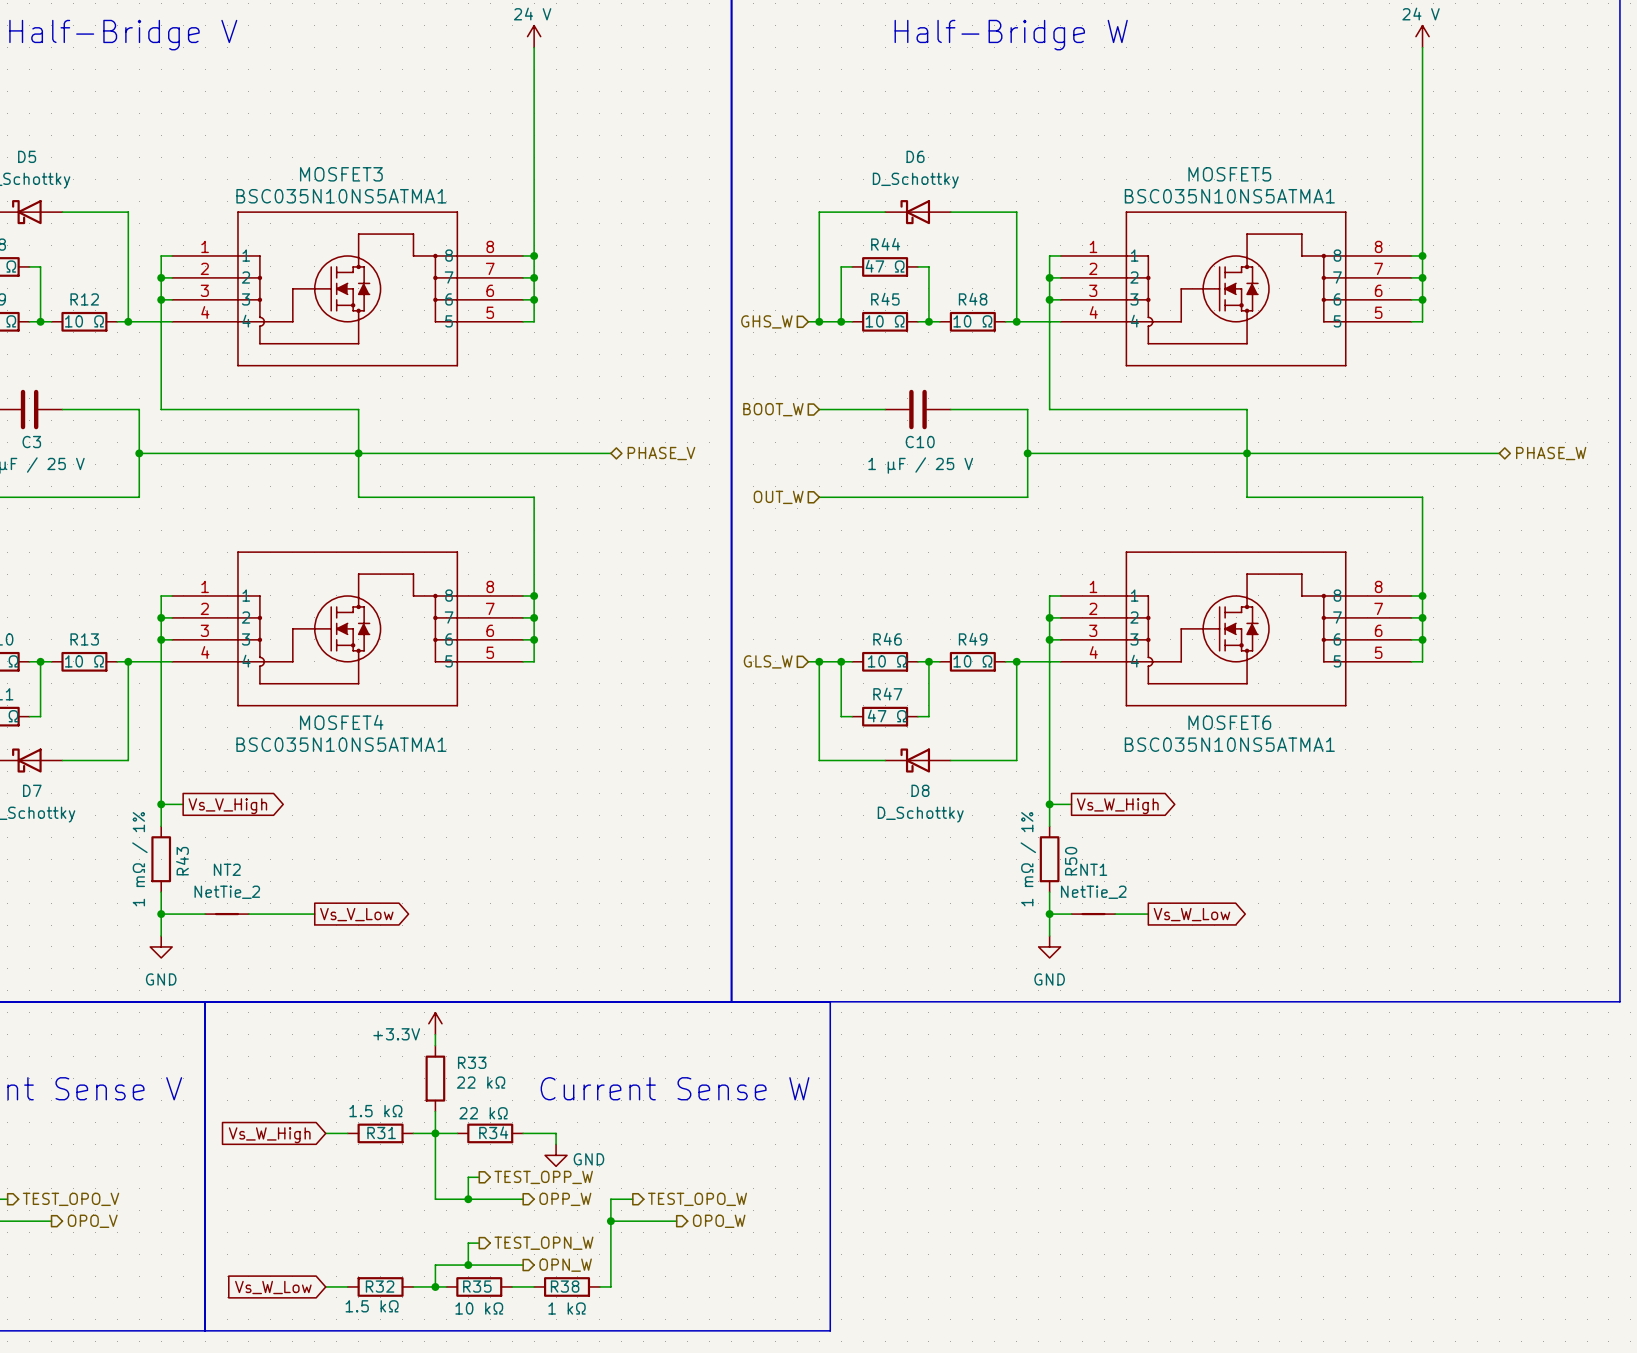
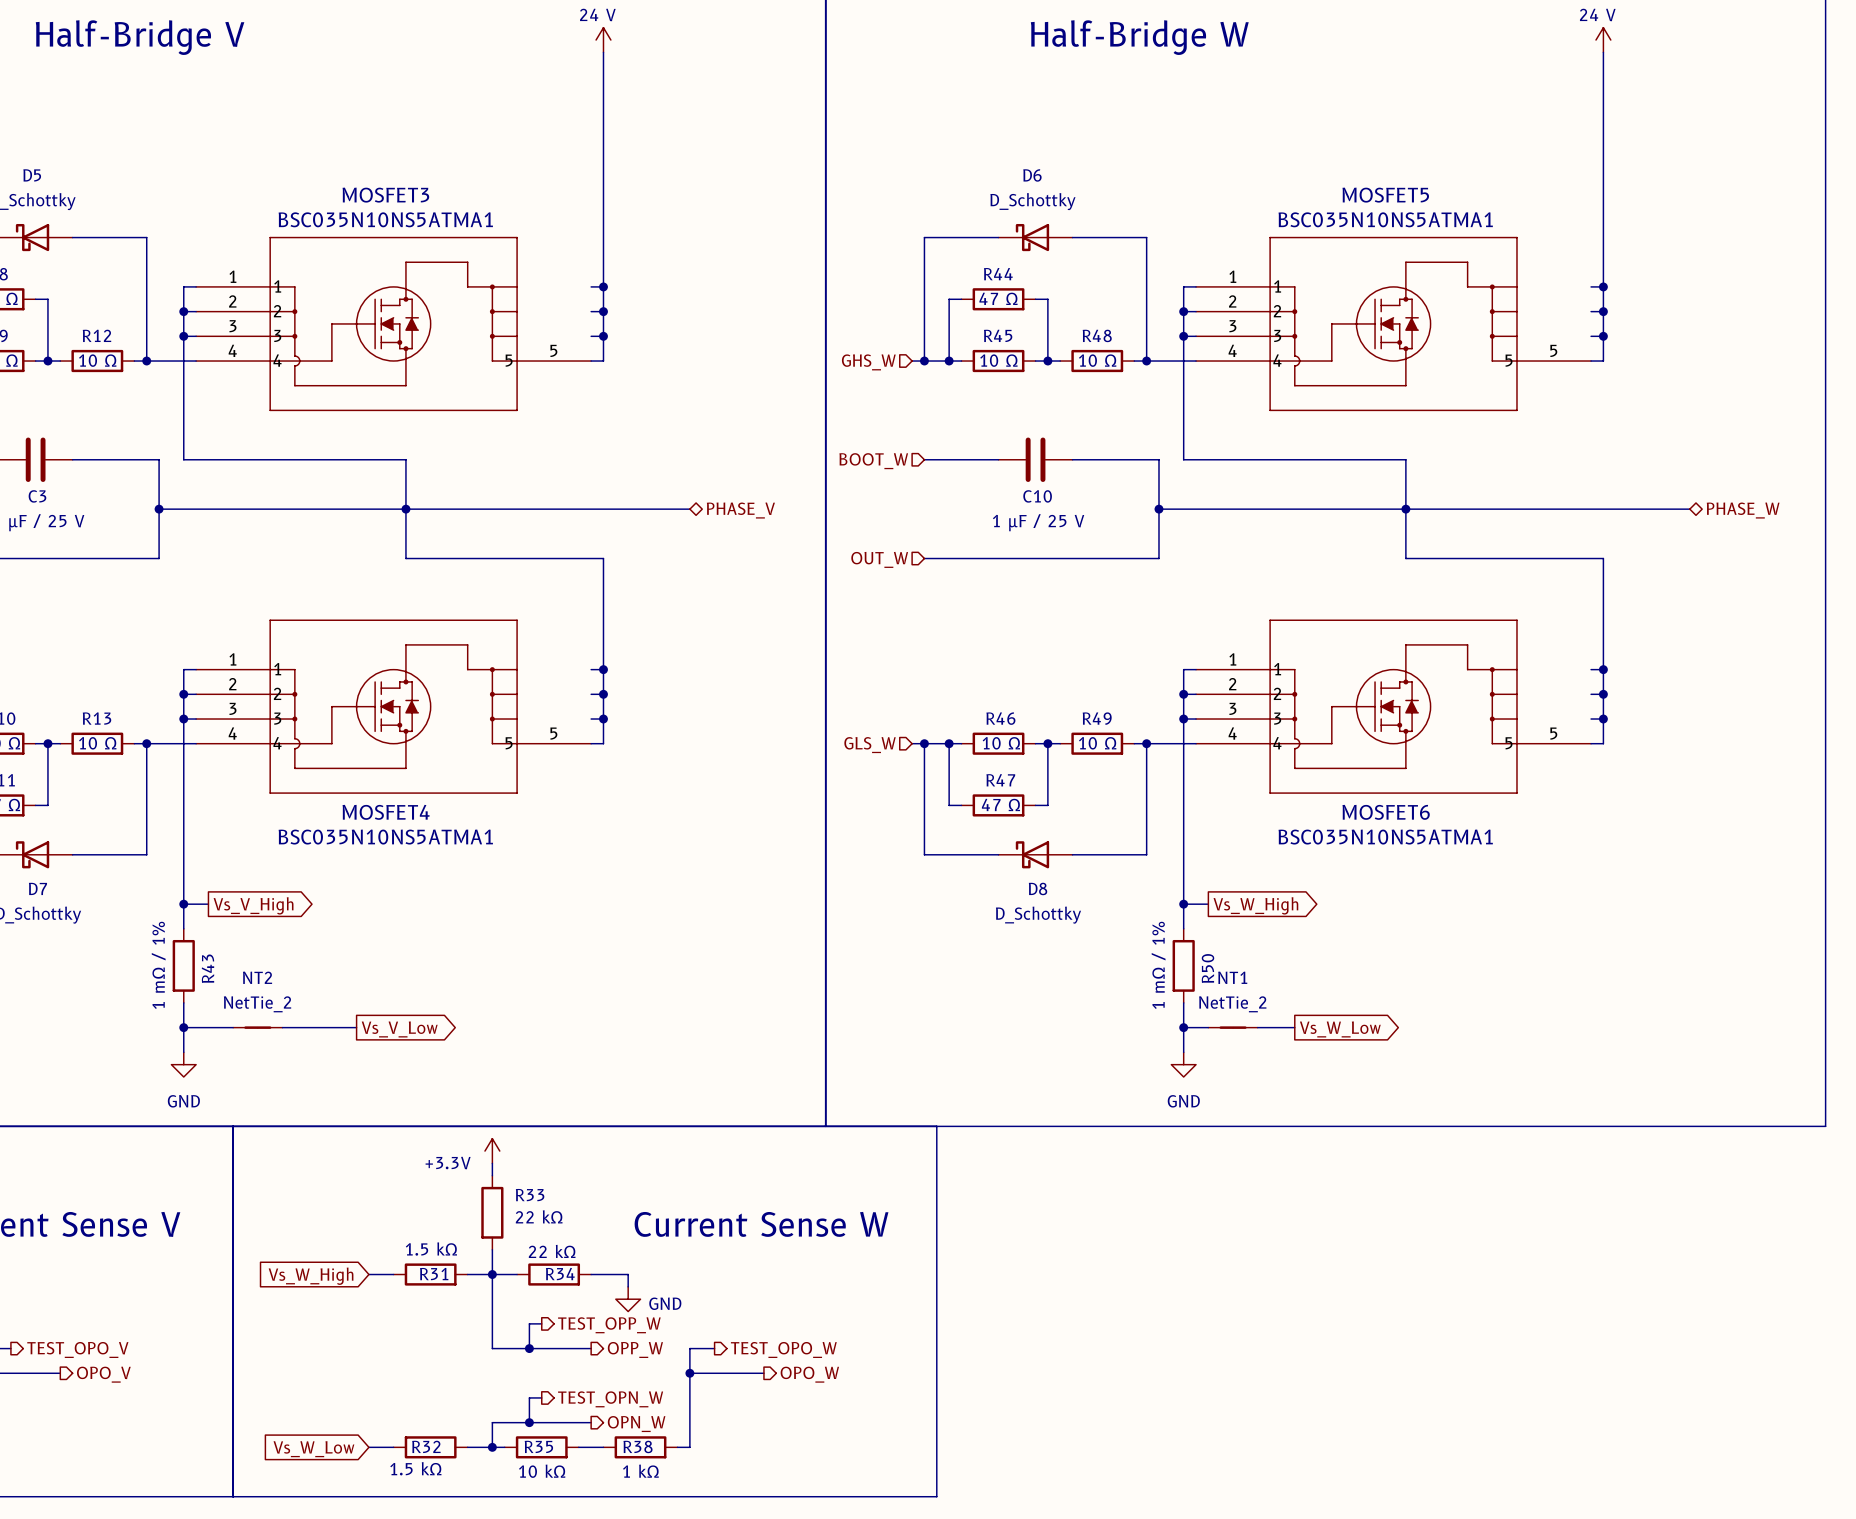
MOSFET3 symbol: [172, 211, 524, 367] -> [196, 236, 592, 412]
MOSFET5 symbol: [1060, 211, 1412, 367] -> [1196, 236, 1592, 412]
MOSFET4 symbol: [172, 551, 524, 707] -> [196, 619, 592, 794]
MOSFET6 symbol: [1060, 551, 1412, 707] -> [1196, 619, 1592, 794]

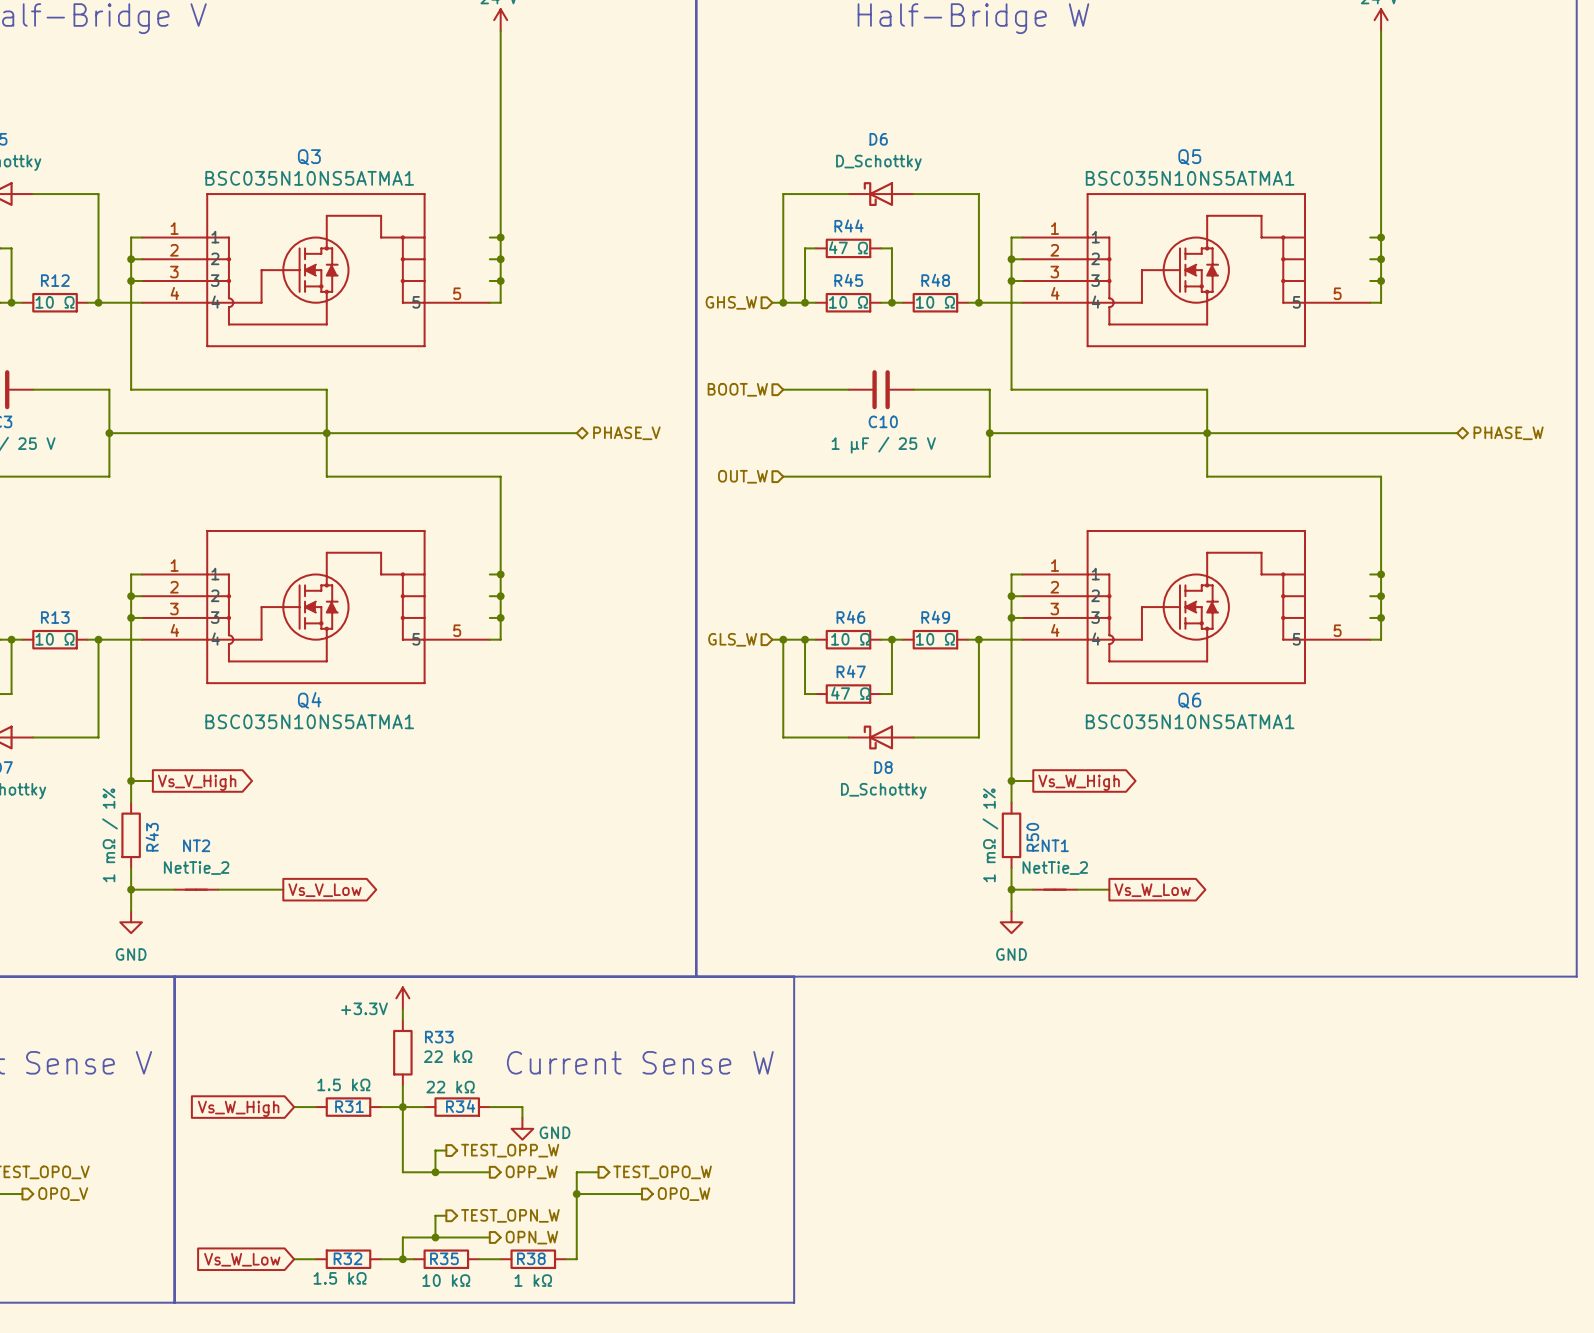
MOSFET3 name: MOSFET3 (385, 195) -> Q3 (309, 157)
MOSFET5 name: MOSFET5 (1385, 195) -> Q5 (1189, 157)
MOSFET4 name: MOSFET4 (386, 812) -> Q4 (309, 700)
MOSFET6 name: MOSFET6 (1386, 812) -> Q6 (1189, 700)

